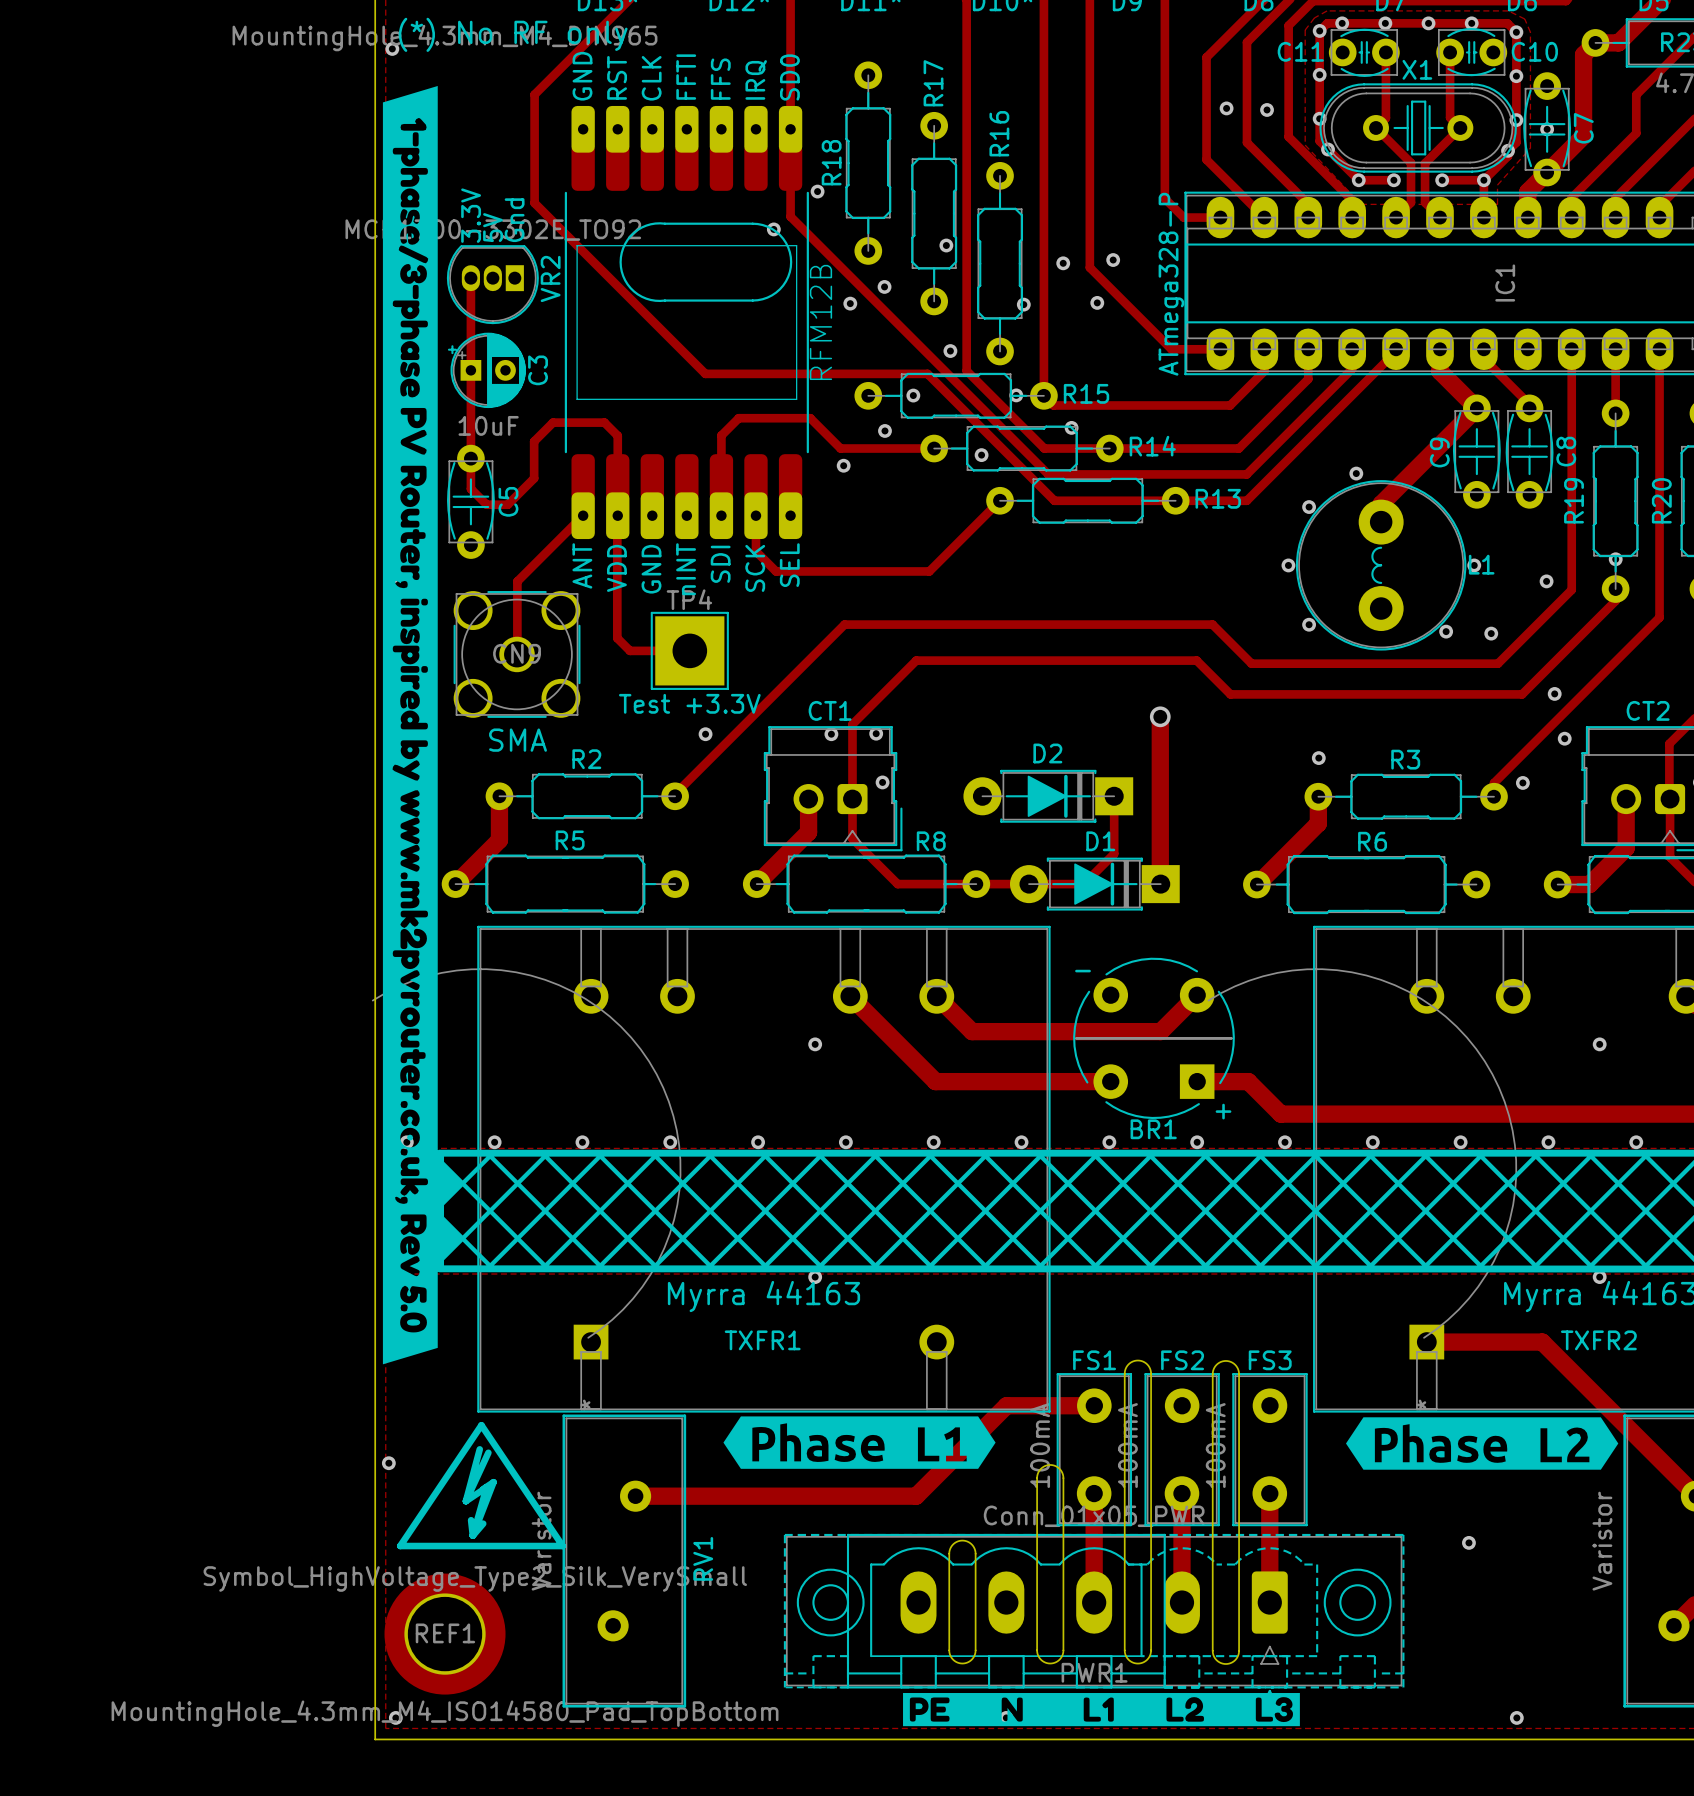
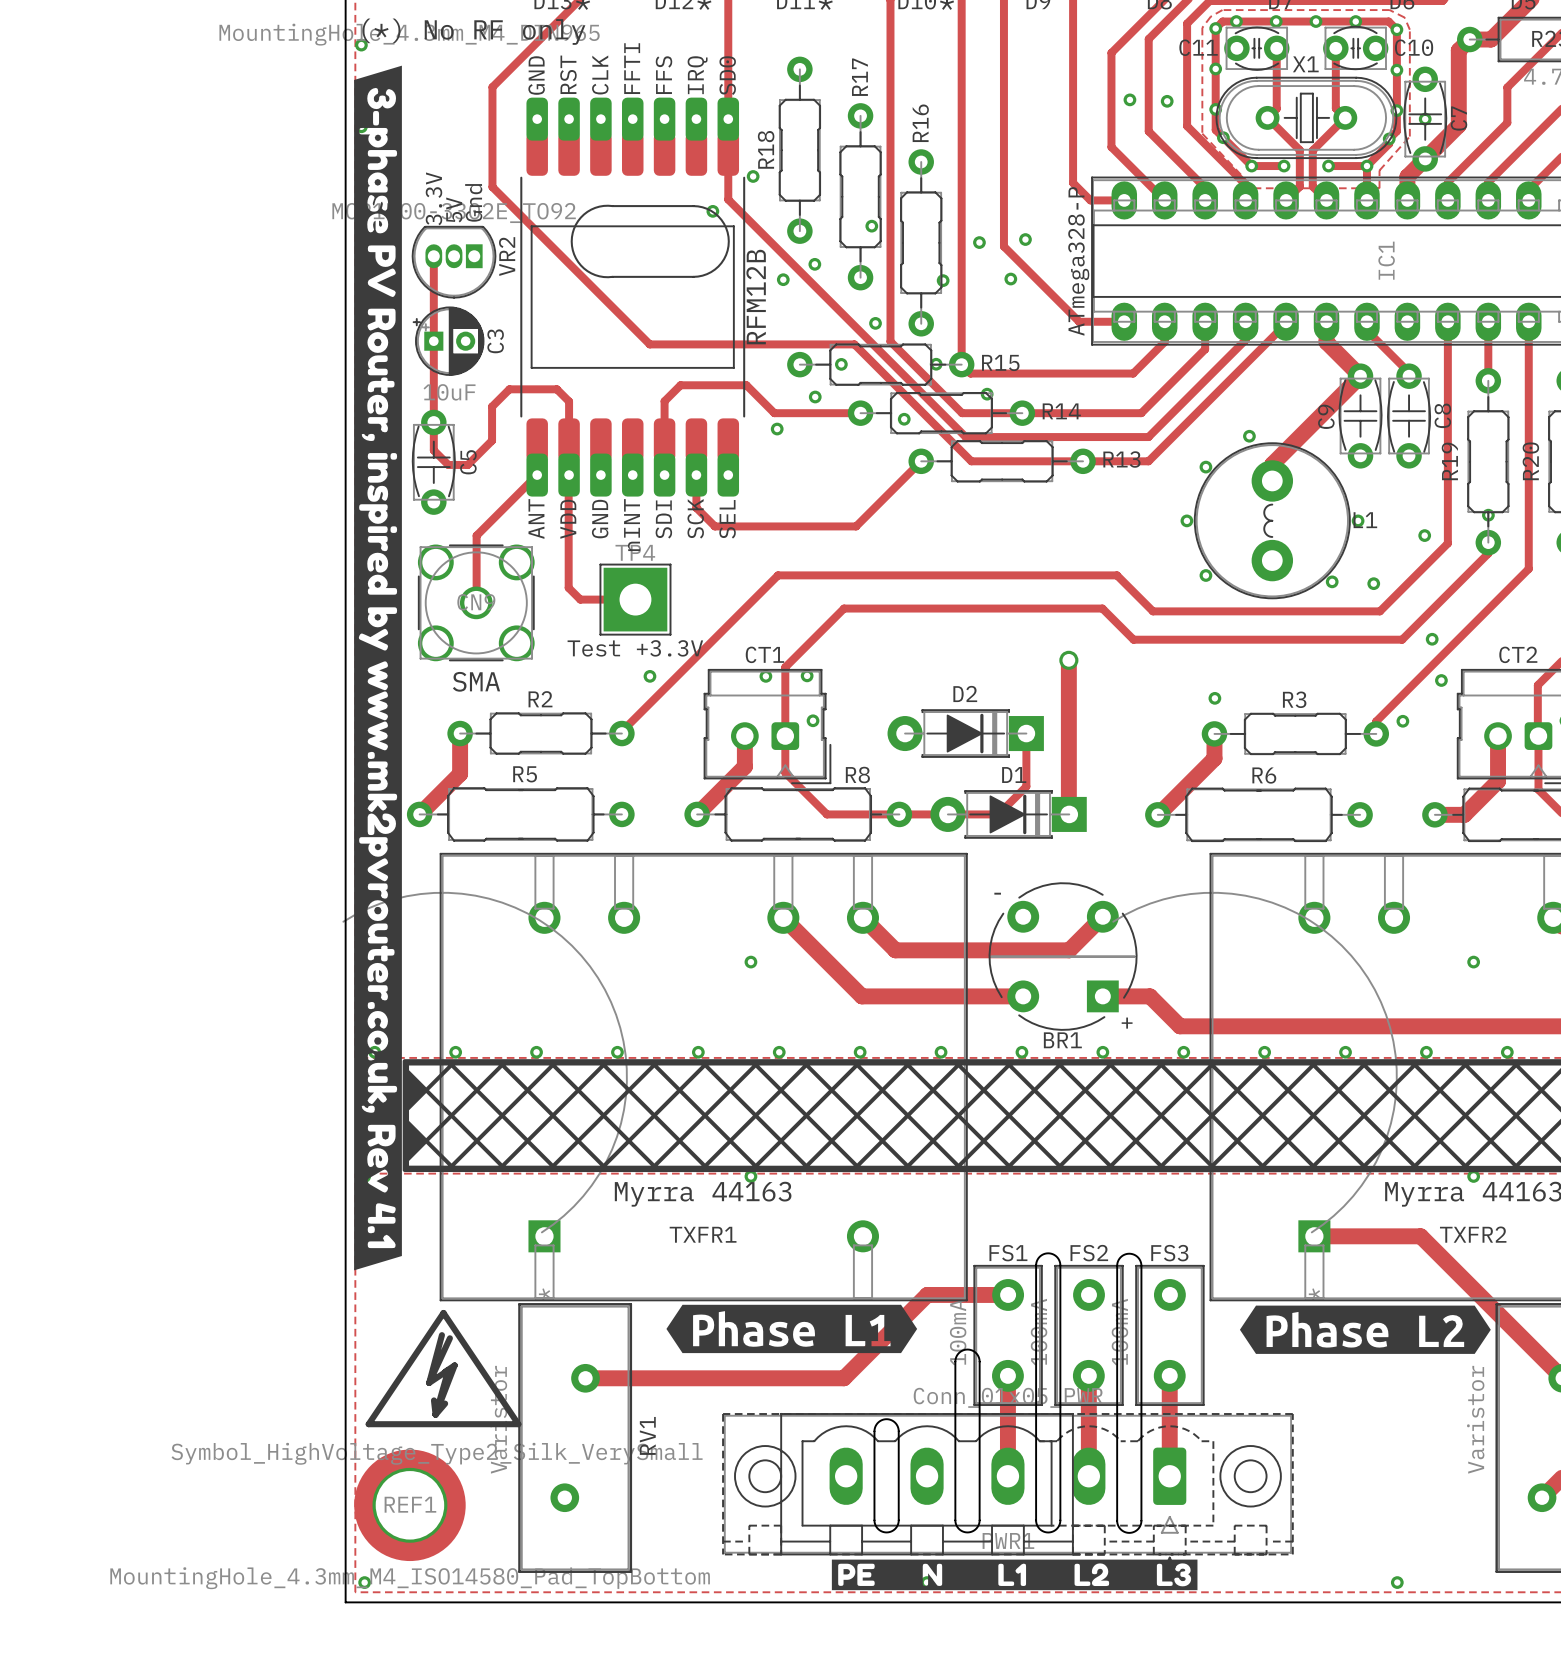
drawing shape: [382, 85, 438, 1365] -> [354, 65, 402, 1271]
via: (388, 1463) -> none
via: (1468, 1542) -> none

